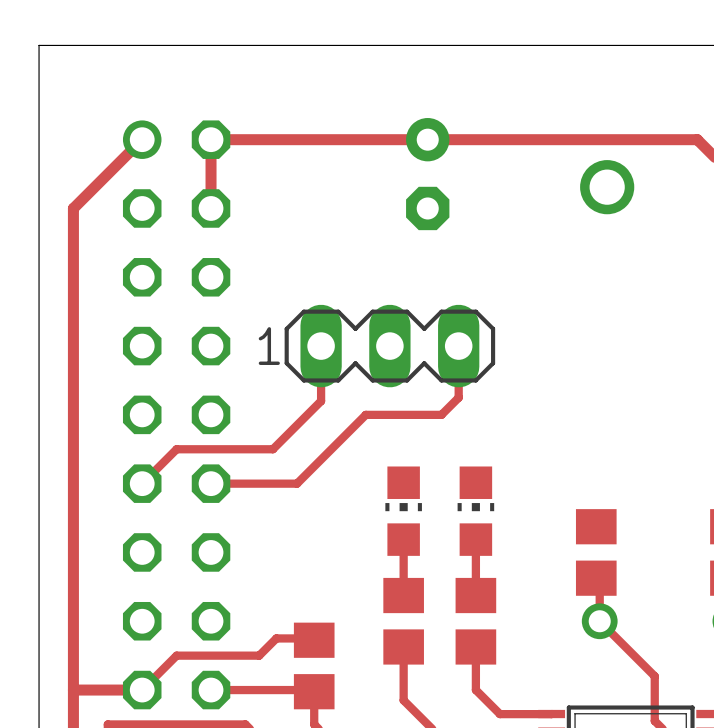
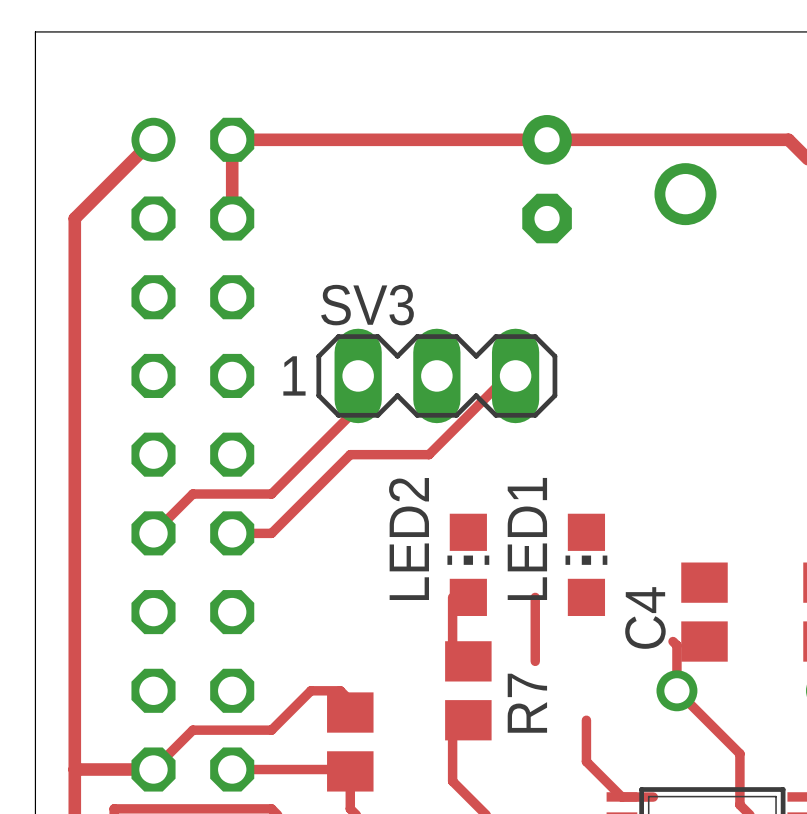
part position: (427, 174) -> (547, 179)
SV3 name: none -> SV3 (367, 305)
track: (321, 346) (321, 401) (272, 449) (245, 449) -> (350, 375) (350, 415) (271, 494)
track: (458, 346) (458, 397) (441, 414) (383, 414) -> (507, 375) (429, 454)
track: (365, 414) (297, 483) (245, 483) -> (409, 454) (350, 454) (271, 533)
LED2 name: none -> LED2 (409, 539)
LED2 position: (403, 511) -> (468, 564)
part: (475, 511) -> none
LED1: none -> (586, 564)
part: (596, 552) -> none
C4: none -> (704, 612)
R7 position: (403, 621) -> (468, 690)
part: (475, 621) -> none
R7 name: none -> R7 (527, 703)
track: (314, 640) (312, 638) (276, 638) (259, 655) (245, 655) -> (350, 700) (340, 690) (310, 690) (271, 730)
track: (475, 646) (475, 690) (499, 714) (551, 714) -> none
track: none -> (586, 720) (586, 761) (621, 797) (653, 797)

